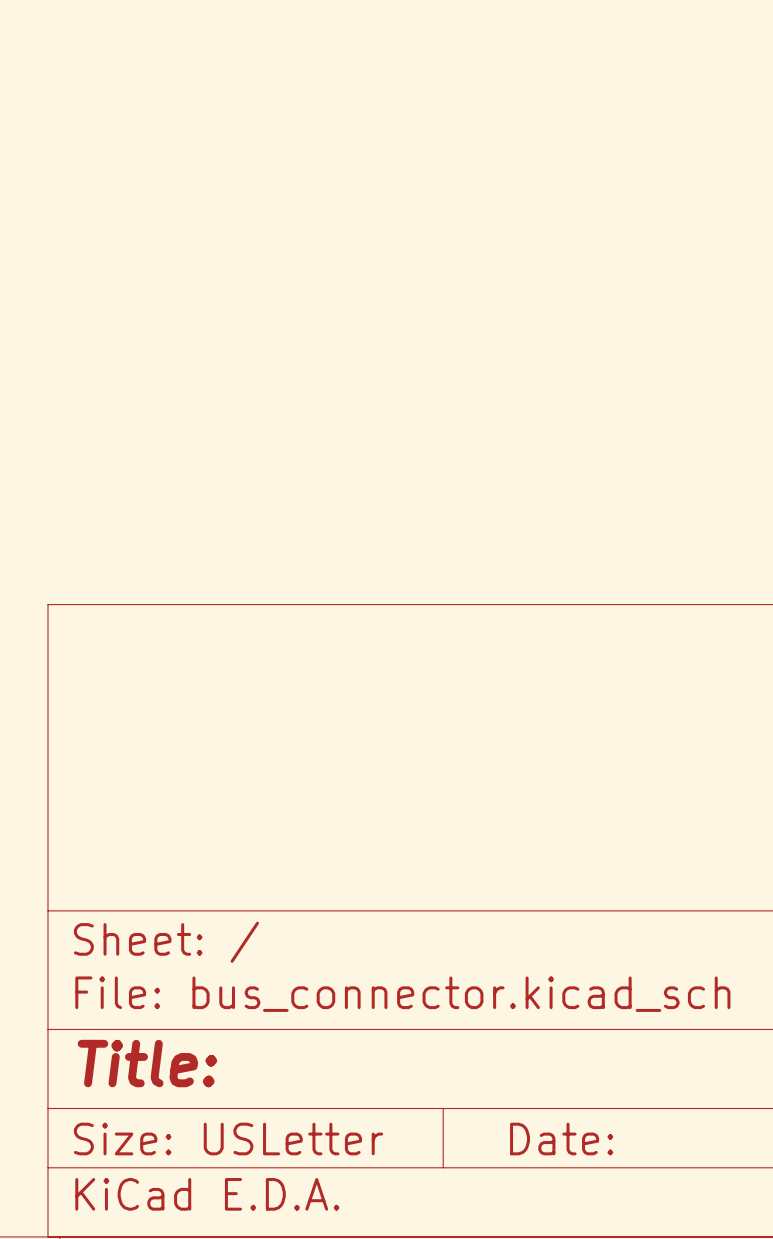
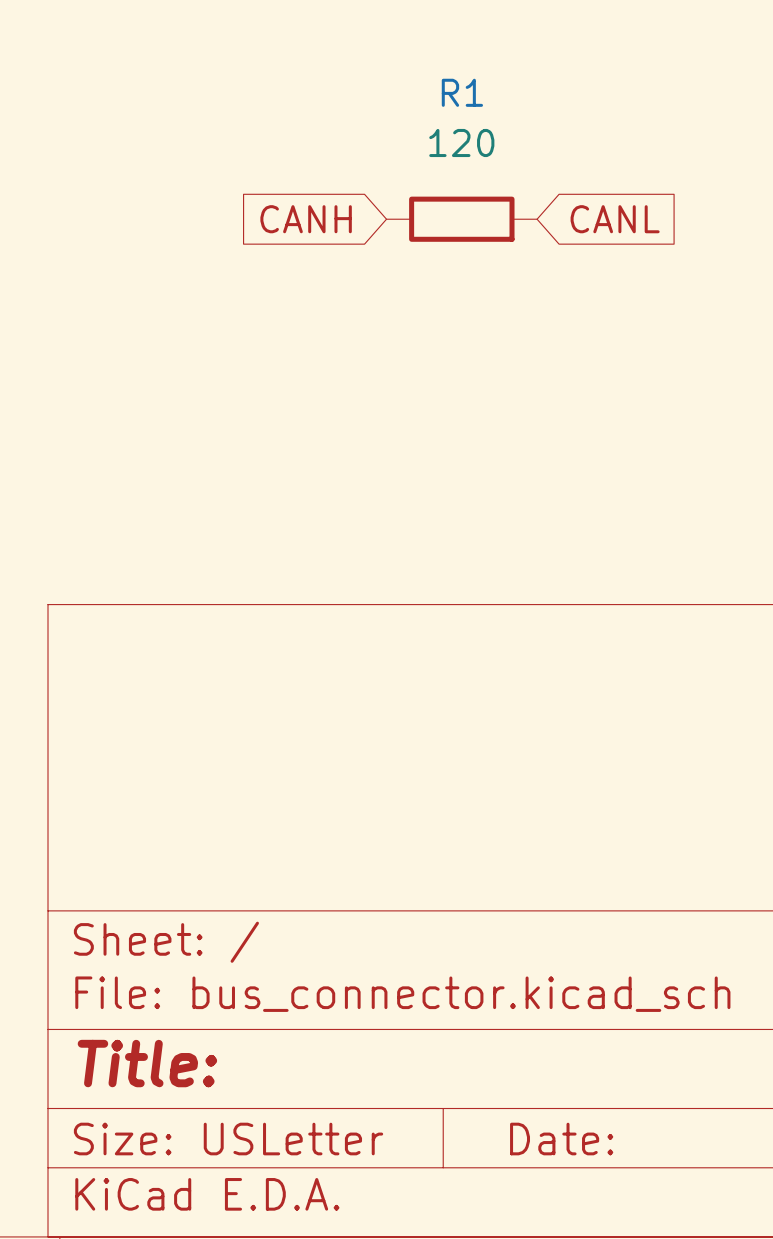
global label: none -> CANH (306, 219)
R1: none -> 120 (461, 219)
global label: none -> CANL (615, 219)

